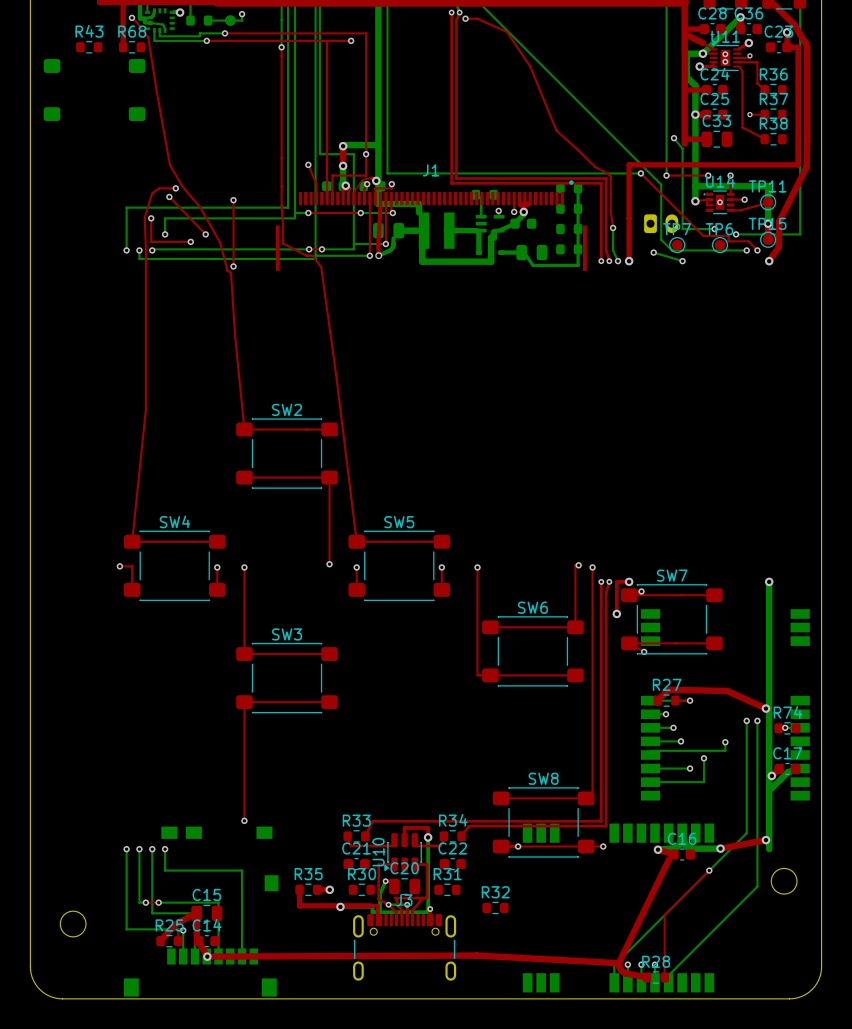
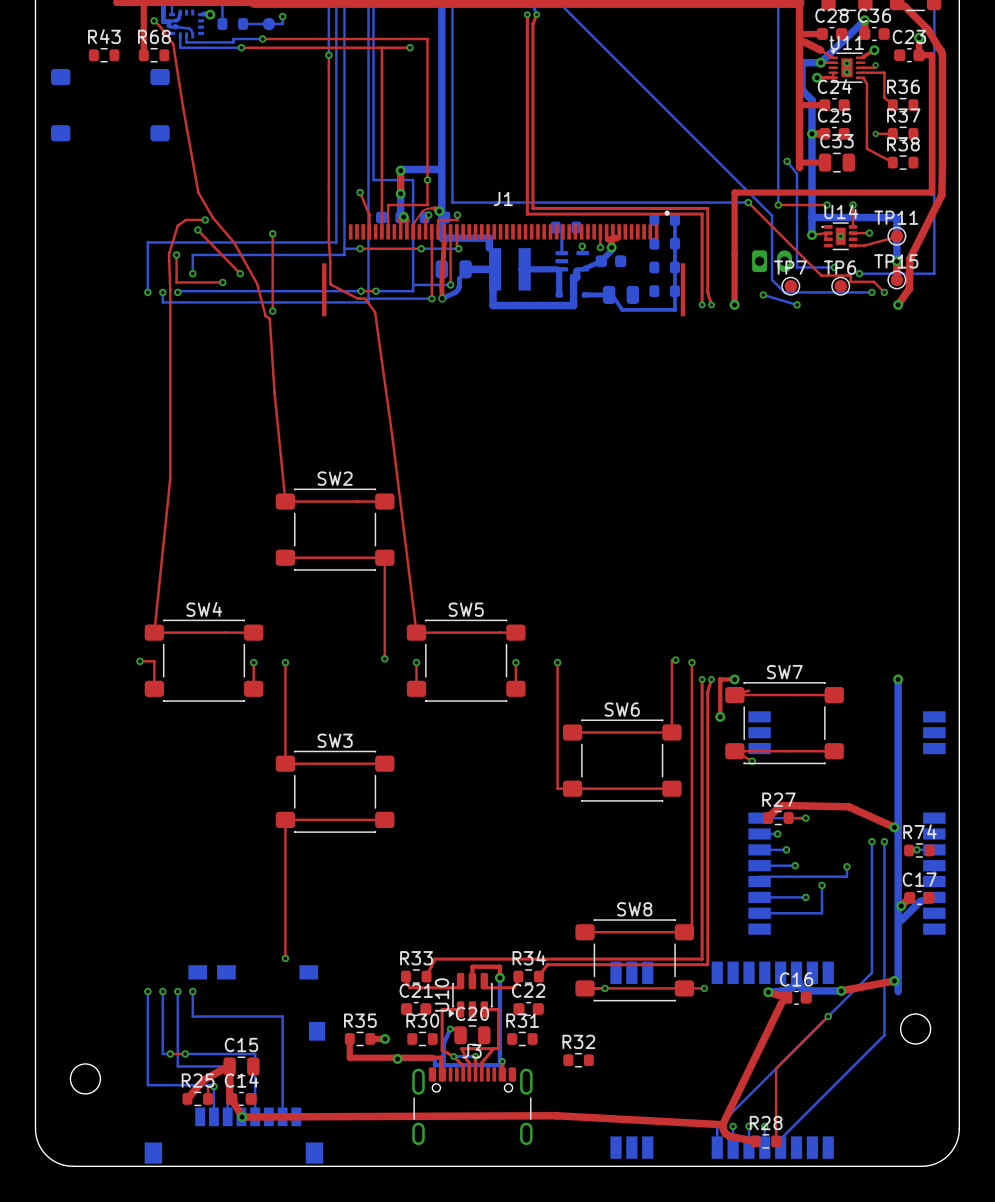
top track: (465, 18) (477, 18) (506, 32) (530, 66) (556, 130) (595, 167) (610, 176) (610, 210) (613, 227) -> none
via: (465, 18) -> none
bottom track: (613, 227) (613, 250) (618, 261) -> none
via: (613, 227) -> none
via: (618, 261) -> none
via: (641, 591) -> none

